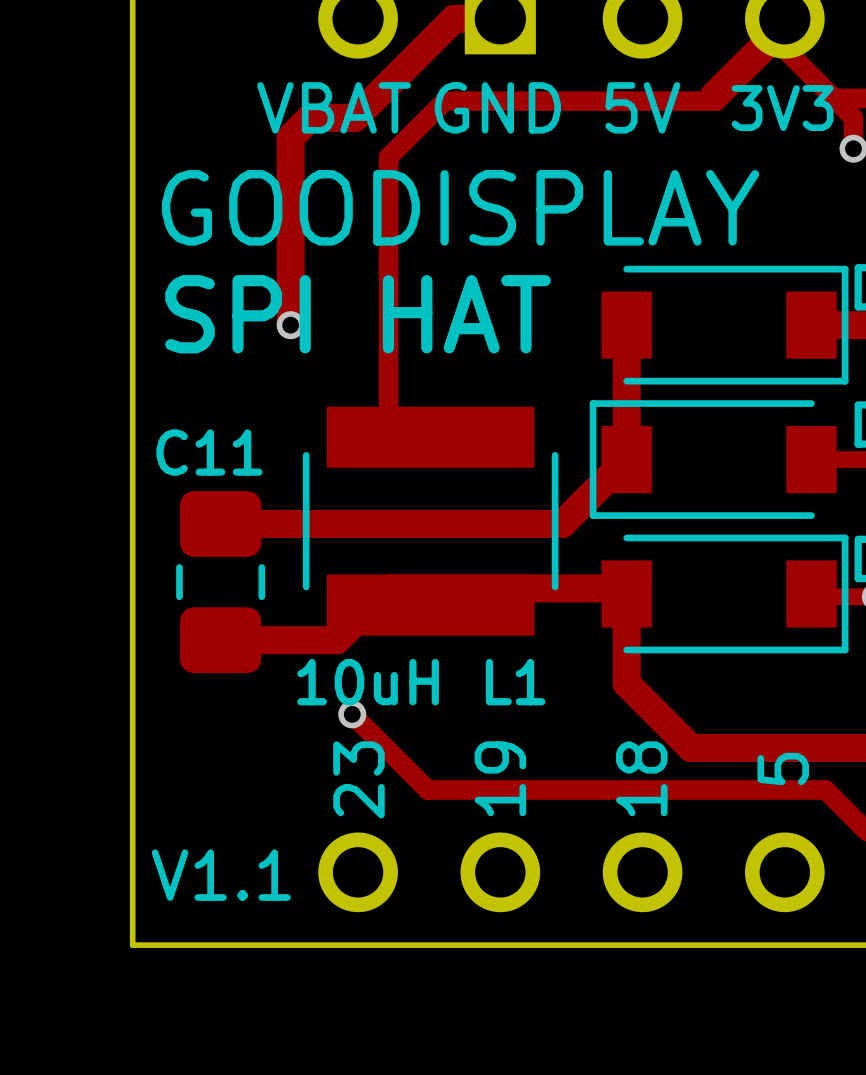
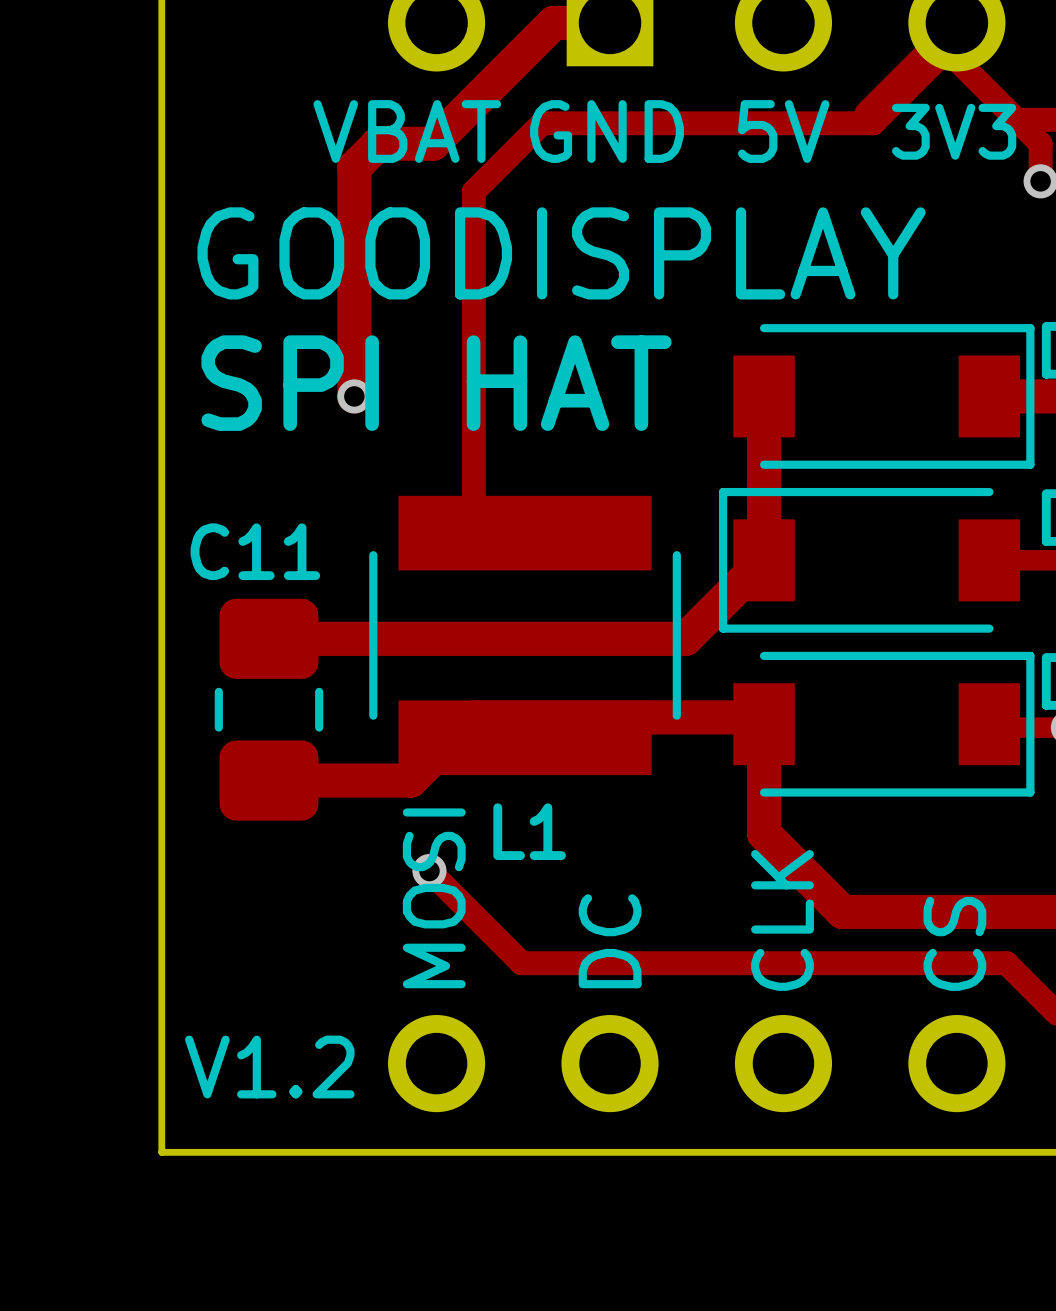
L1 value: 10uH (368, 682) -> none
L1 name position: L1 (515, 682) -> L1 (529, 831)
text: 5 (783, 769) -> CS (954, 943)
text: 19 (500, 778) -> DC (610, 941)
text: 18 (641, 778) -> CLK (782, 920)
text: 23 (358, 779) -> MOSI (434, 898)
text: V1.1 (221, 875) -> V1.2 (269, 1067)

